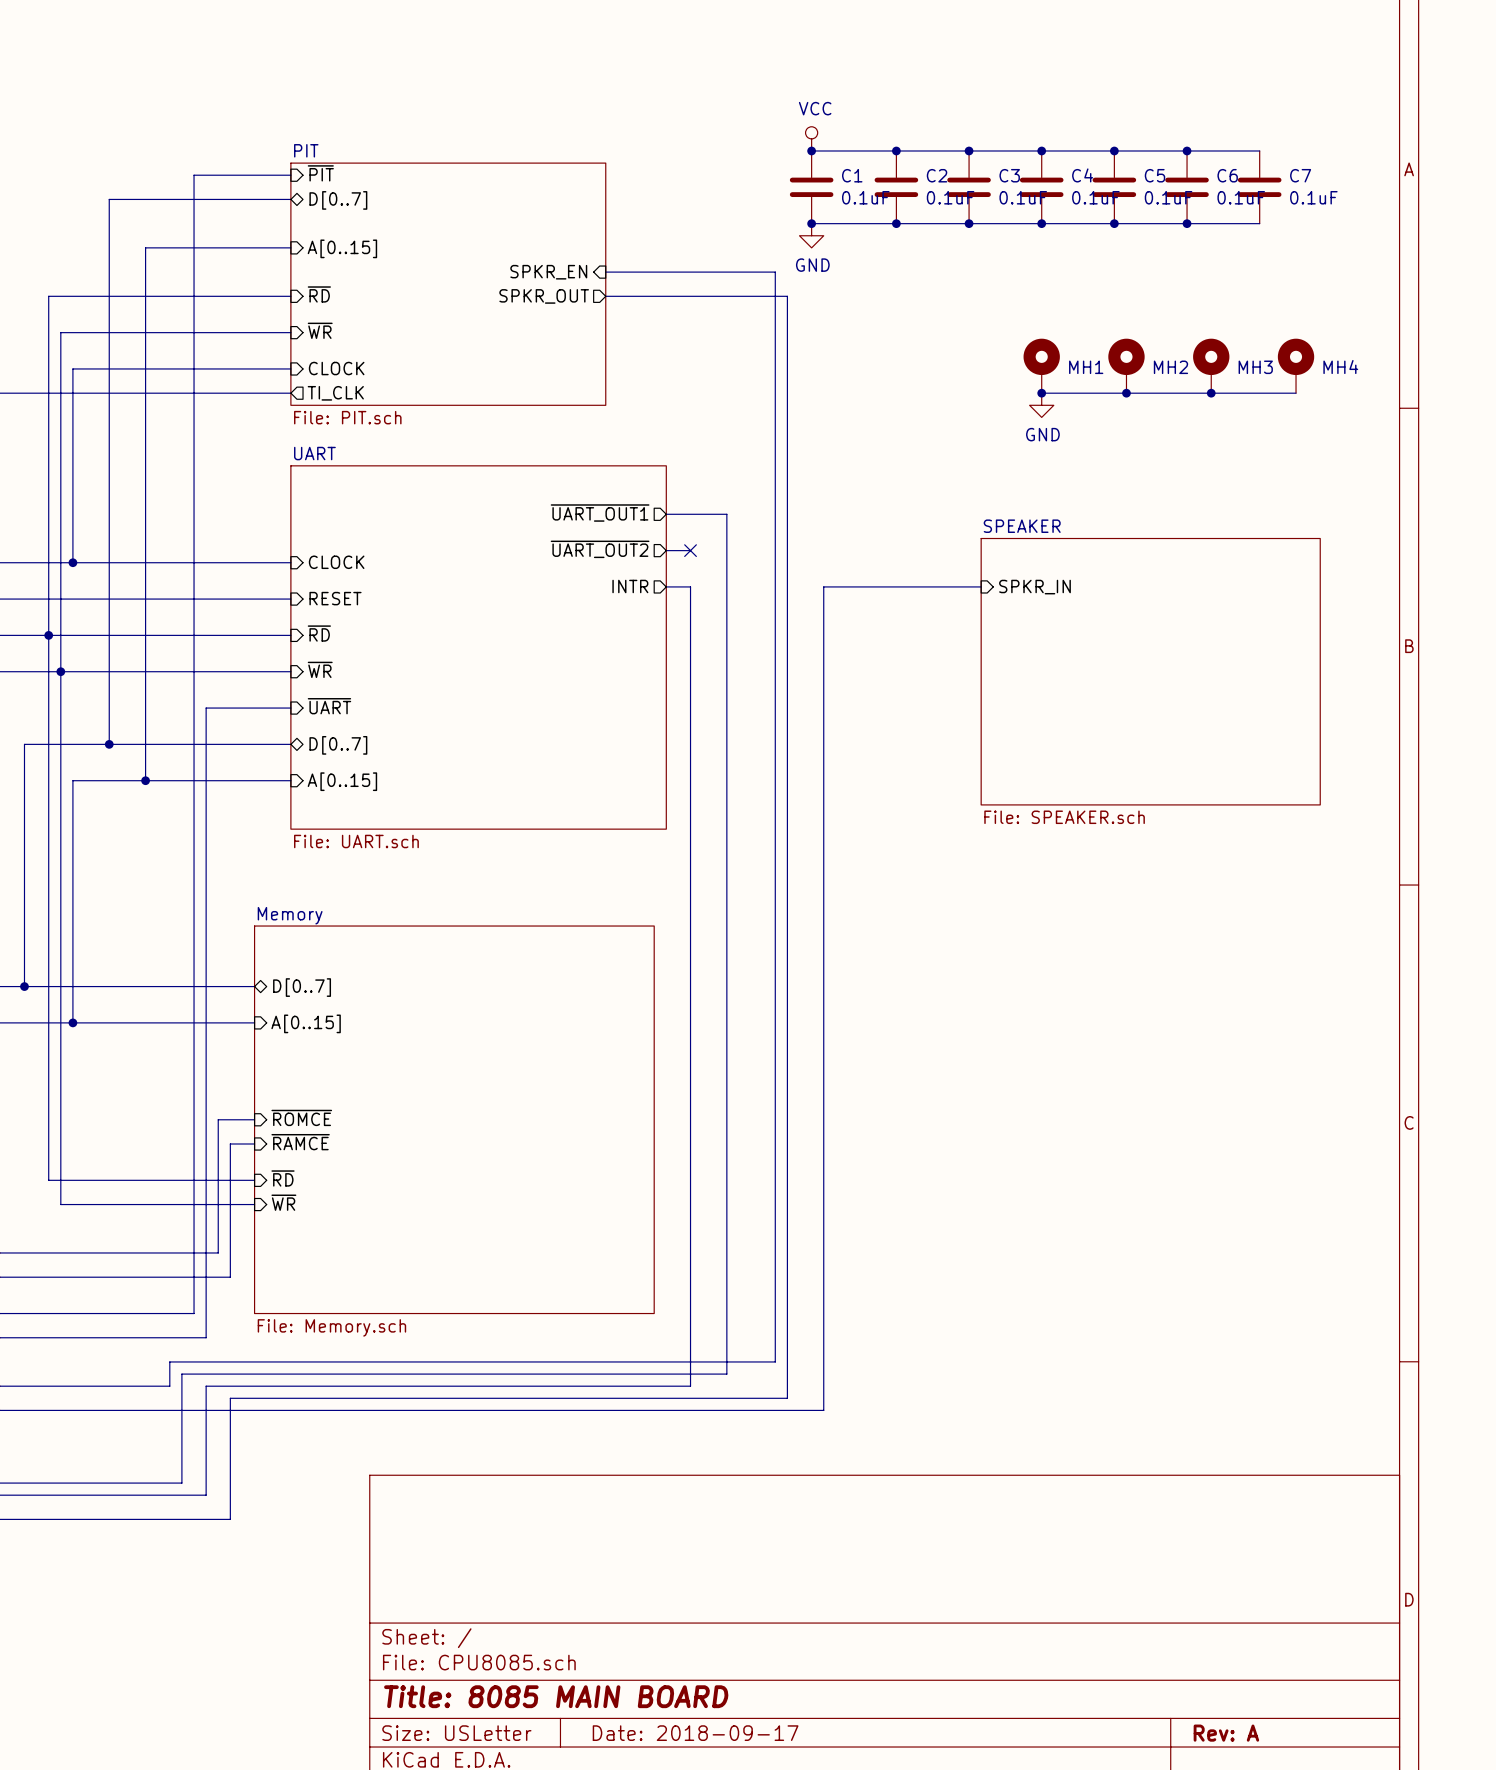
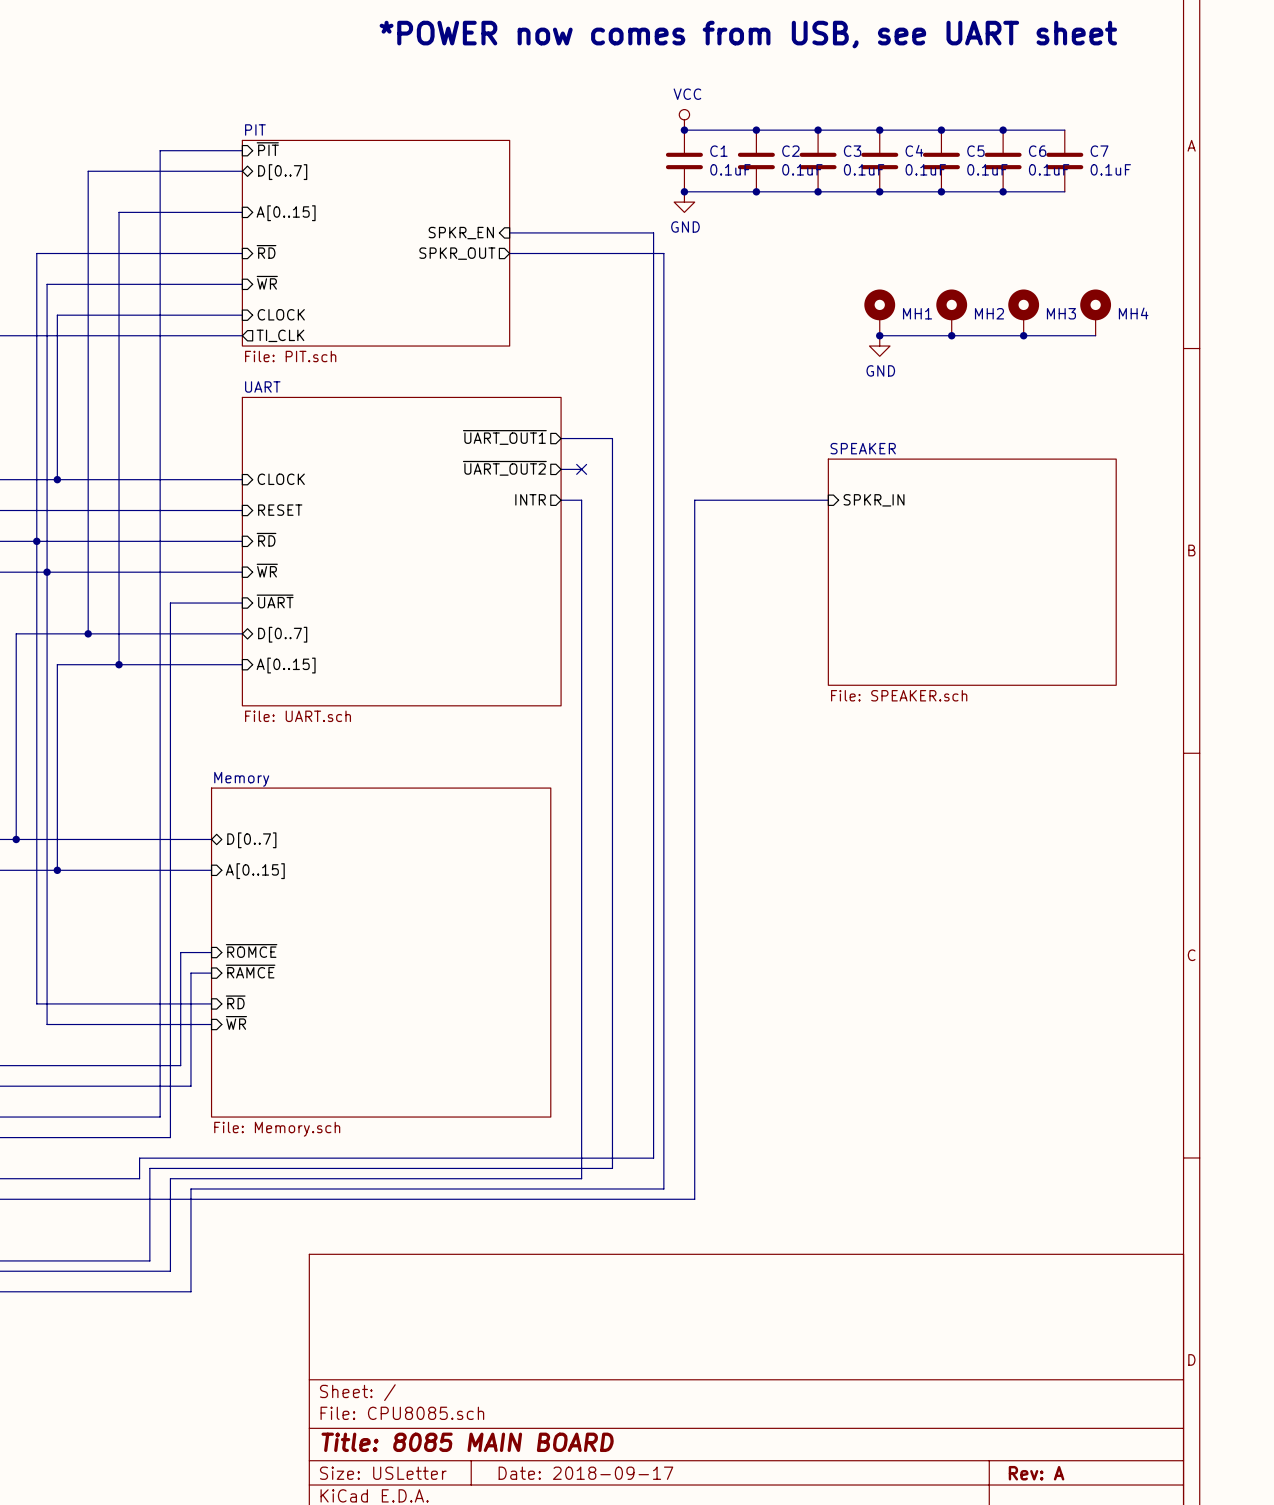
text: none -> *POWER now comes from USB, see UART sheet (748, 34)

